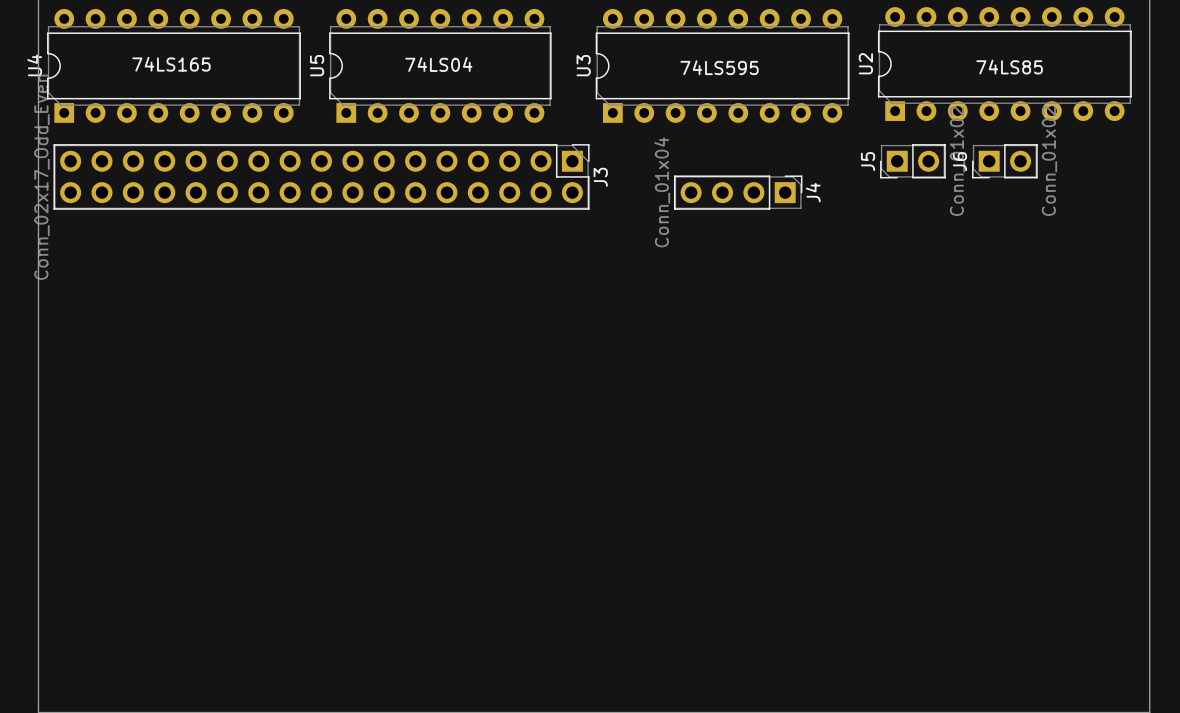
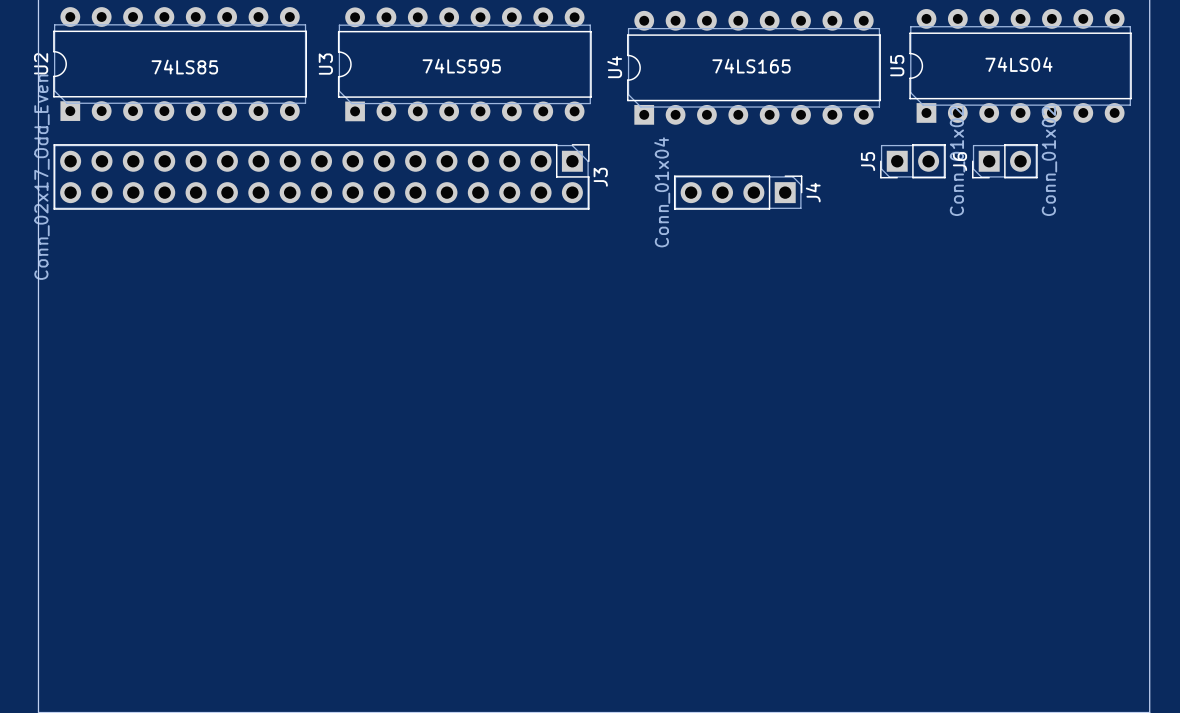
U2 position: (1004, 64) -> (180, 64)
U4 position: (173, 65) -> (753, 67)
U5 position: (440, 65) -> (1020, 65)
U3 position: (722, 65) -> (464, 64)

